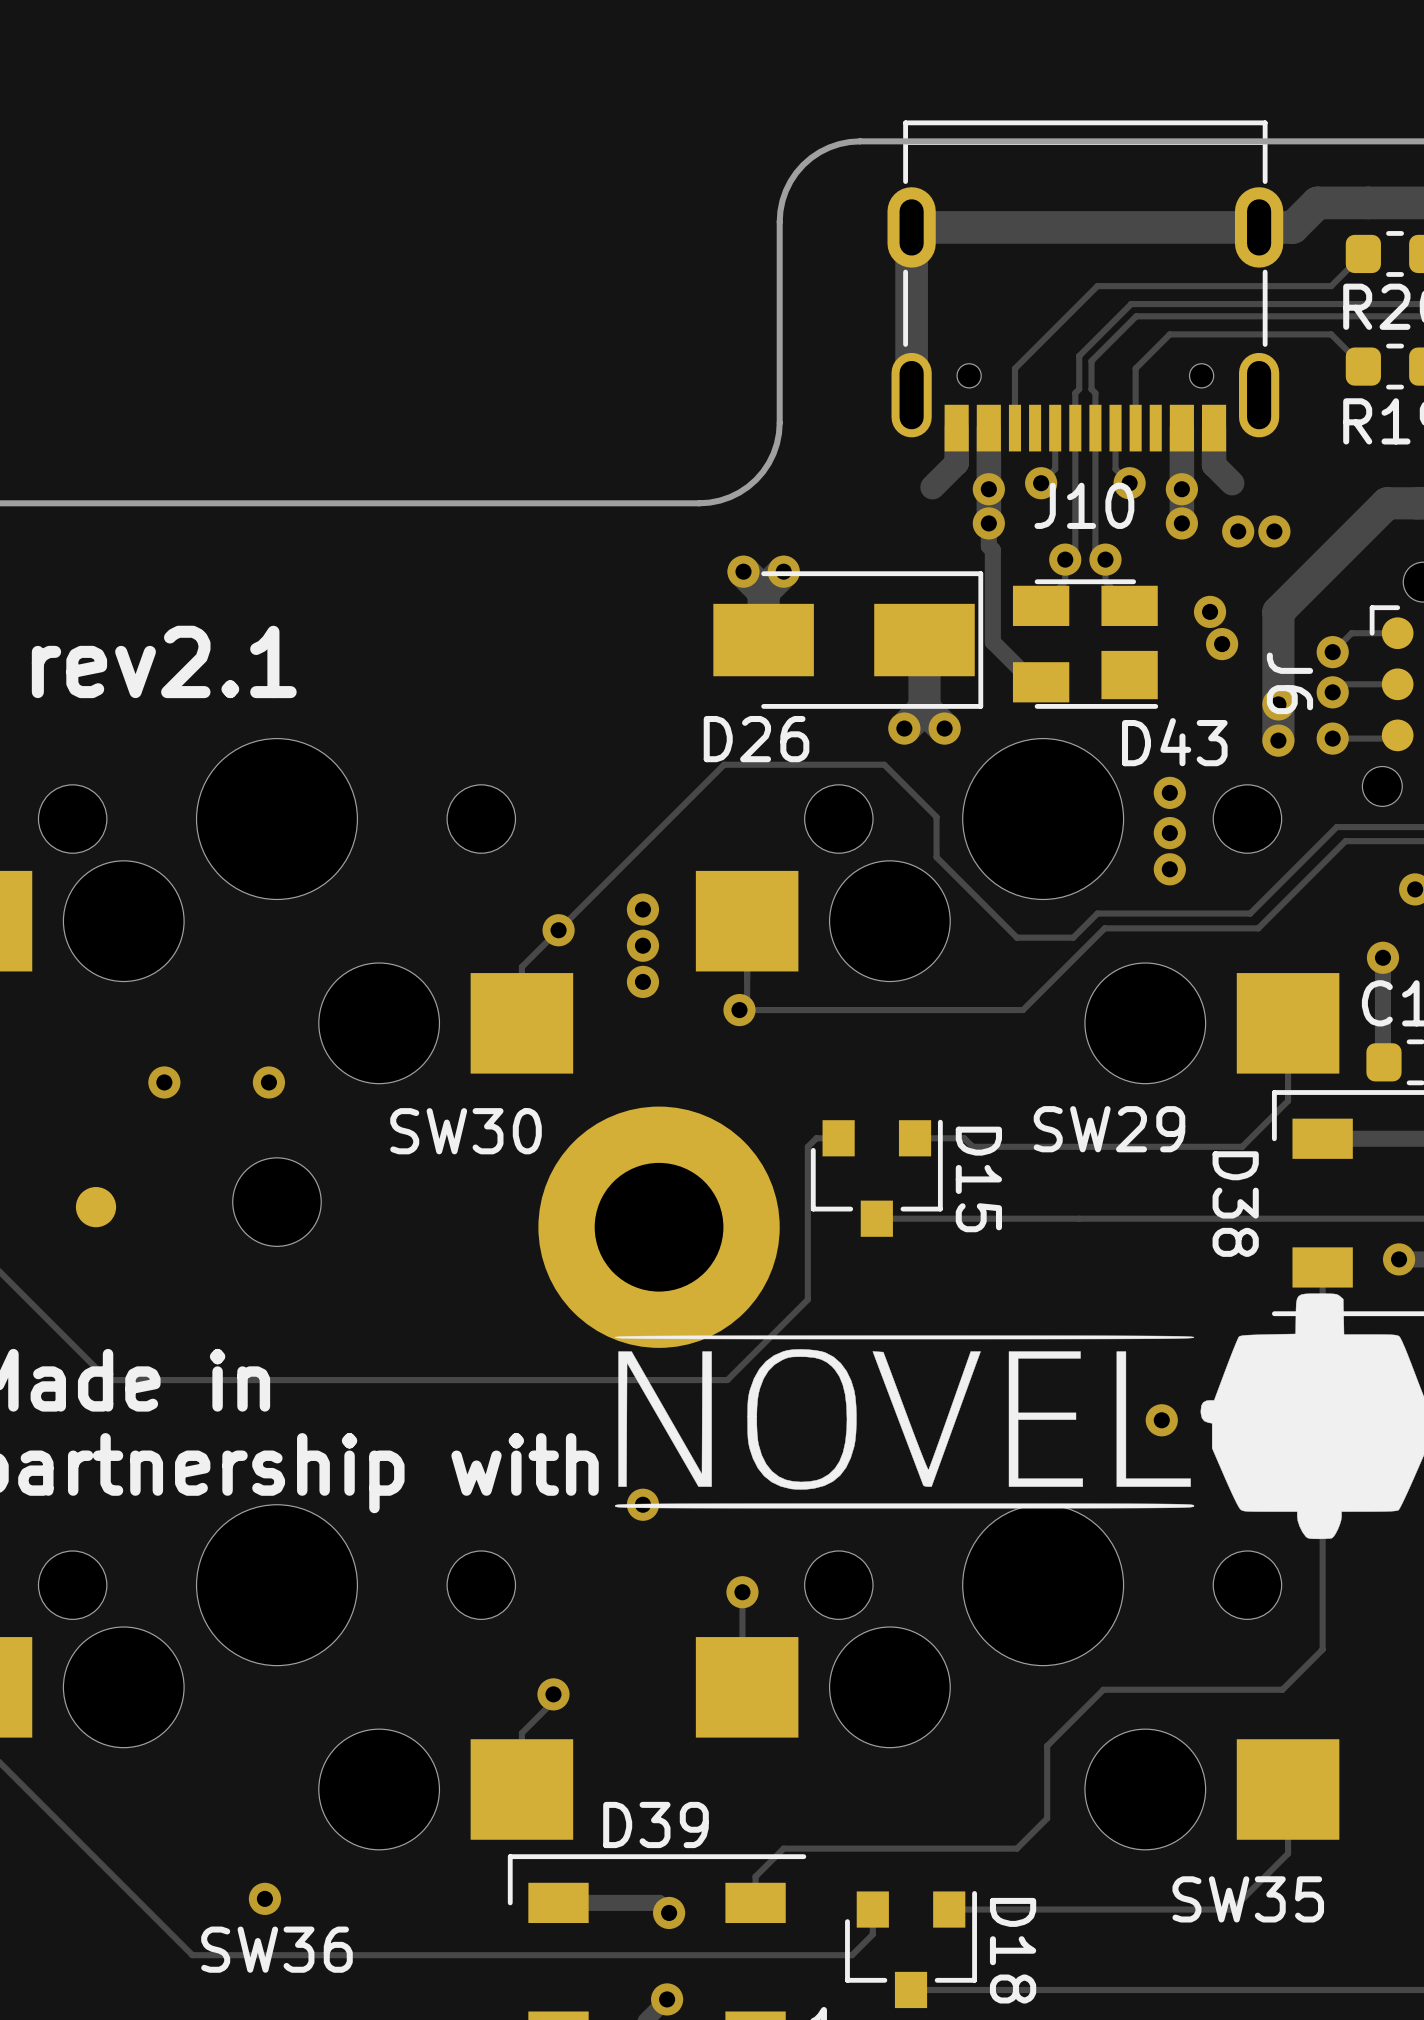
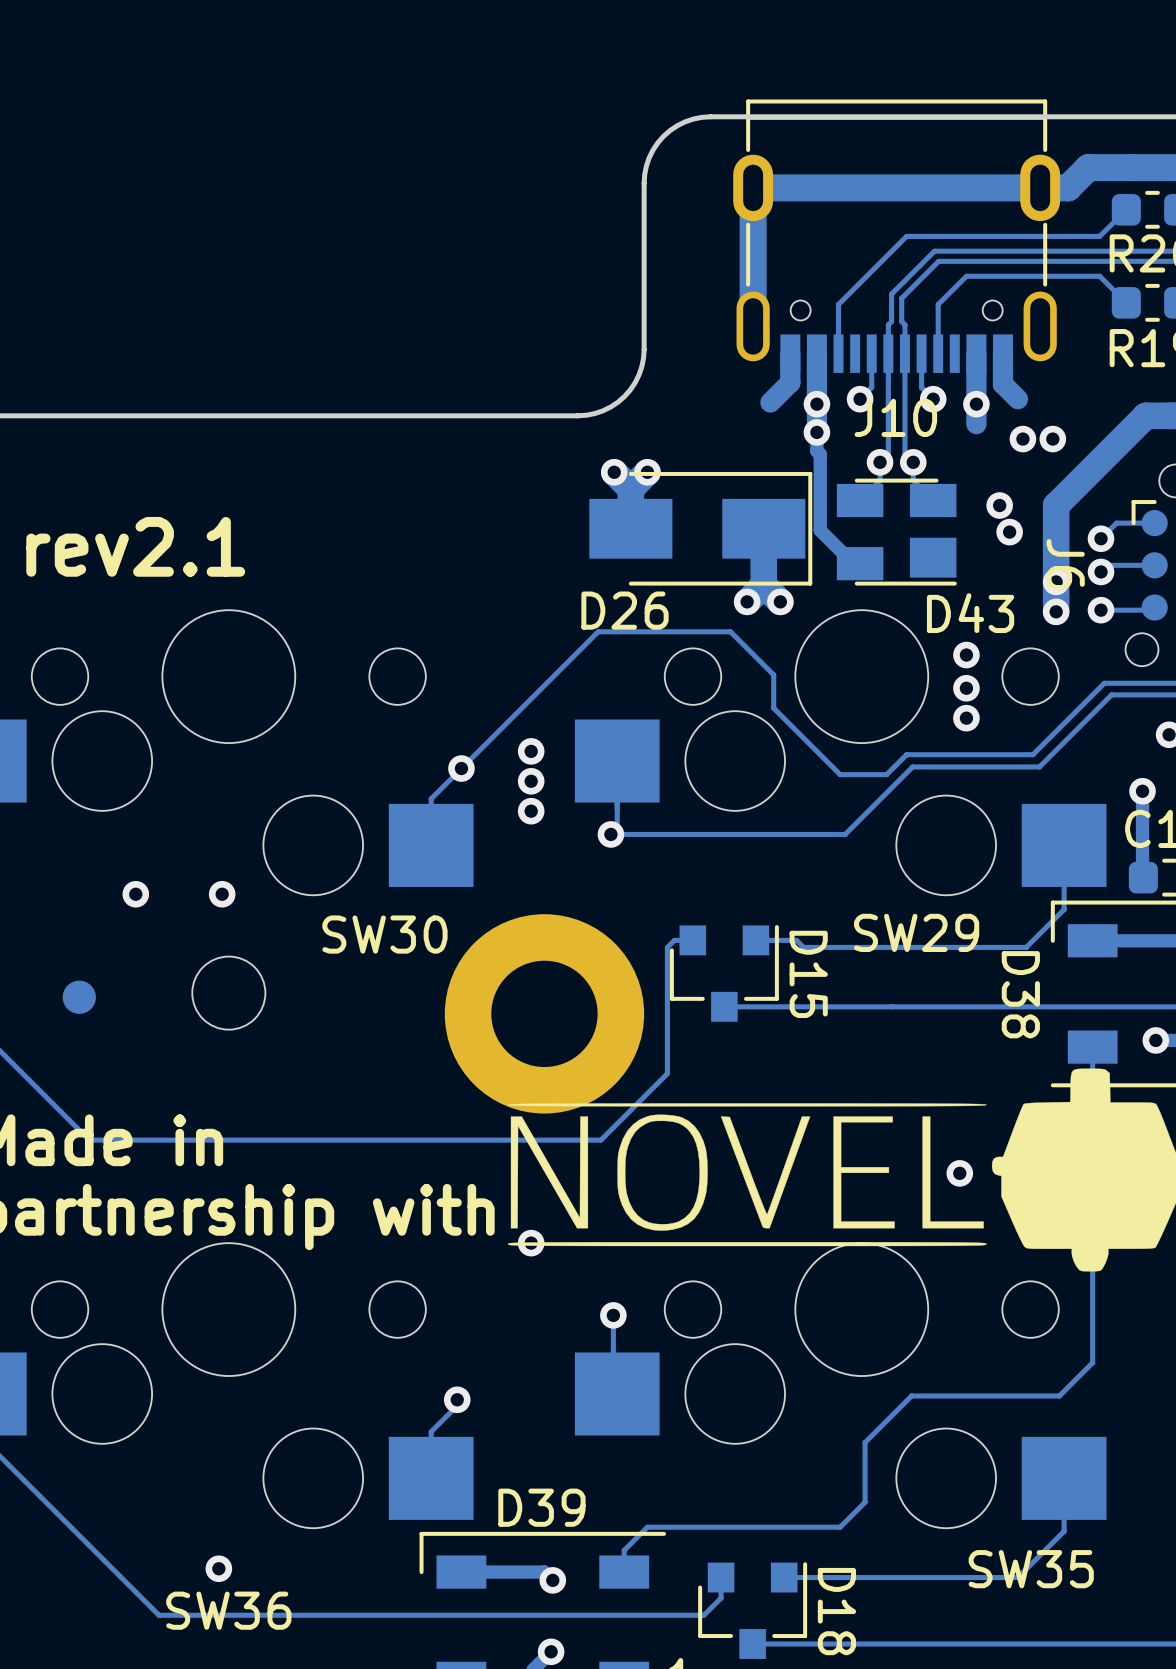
via: (1181, 523) -> none

